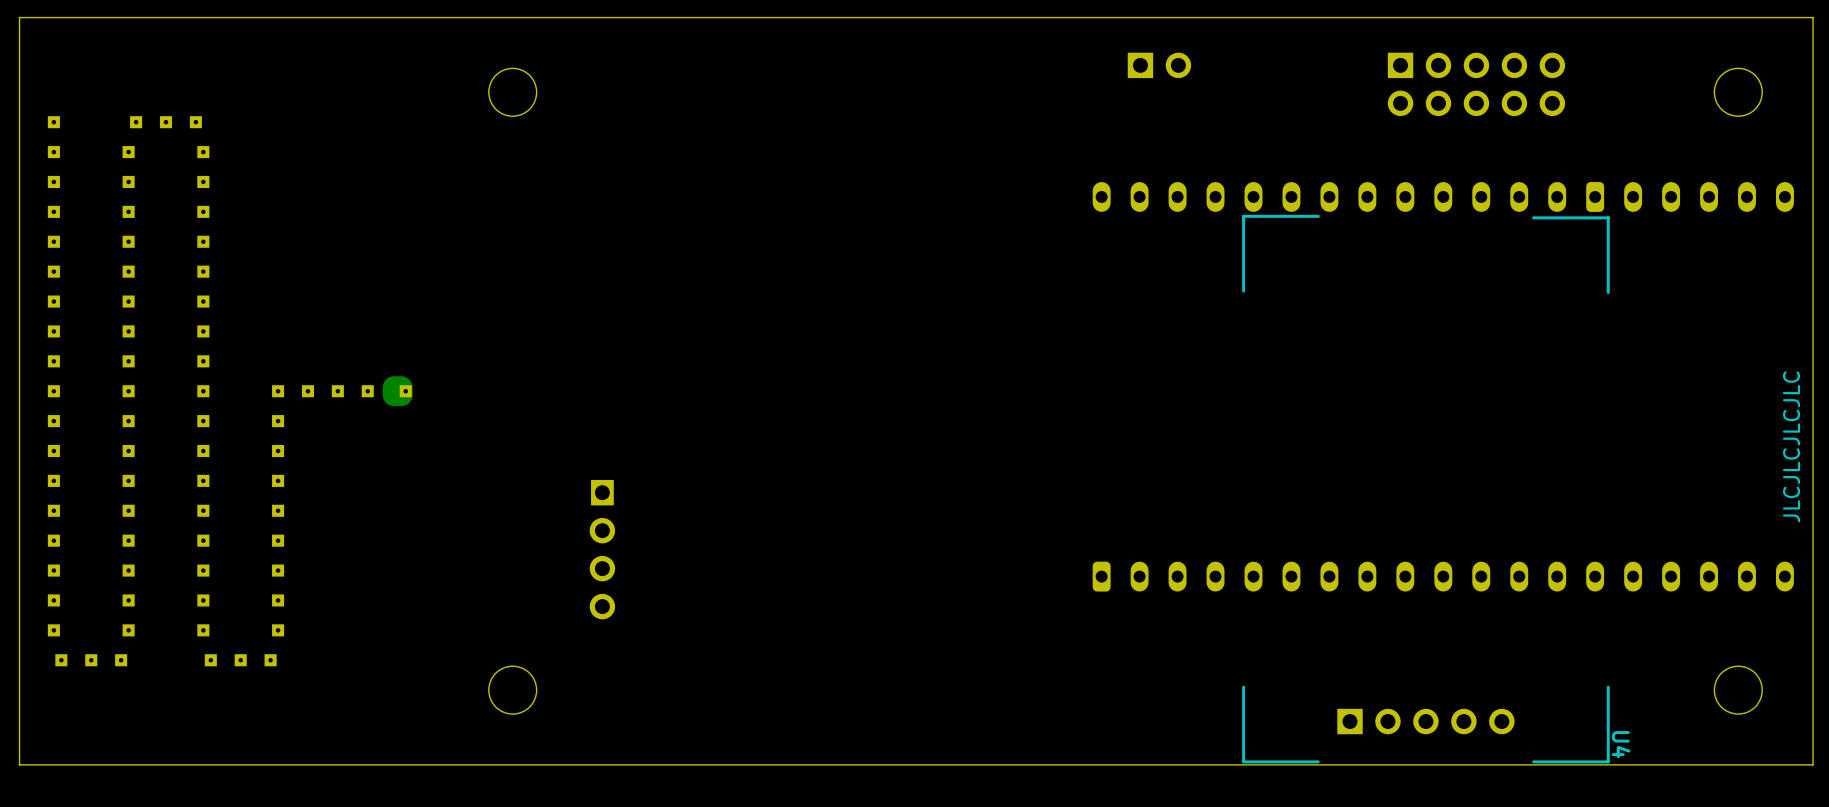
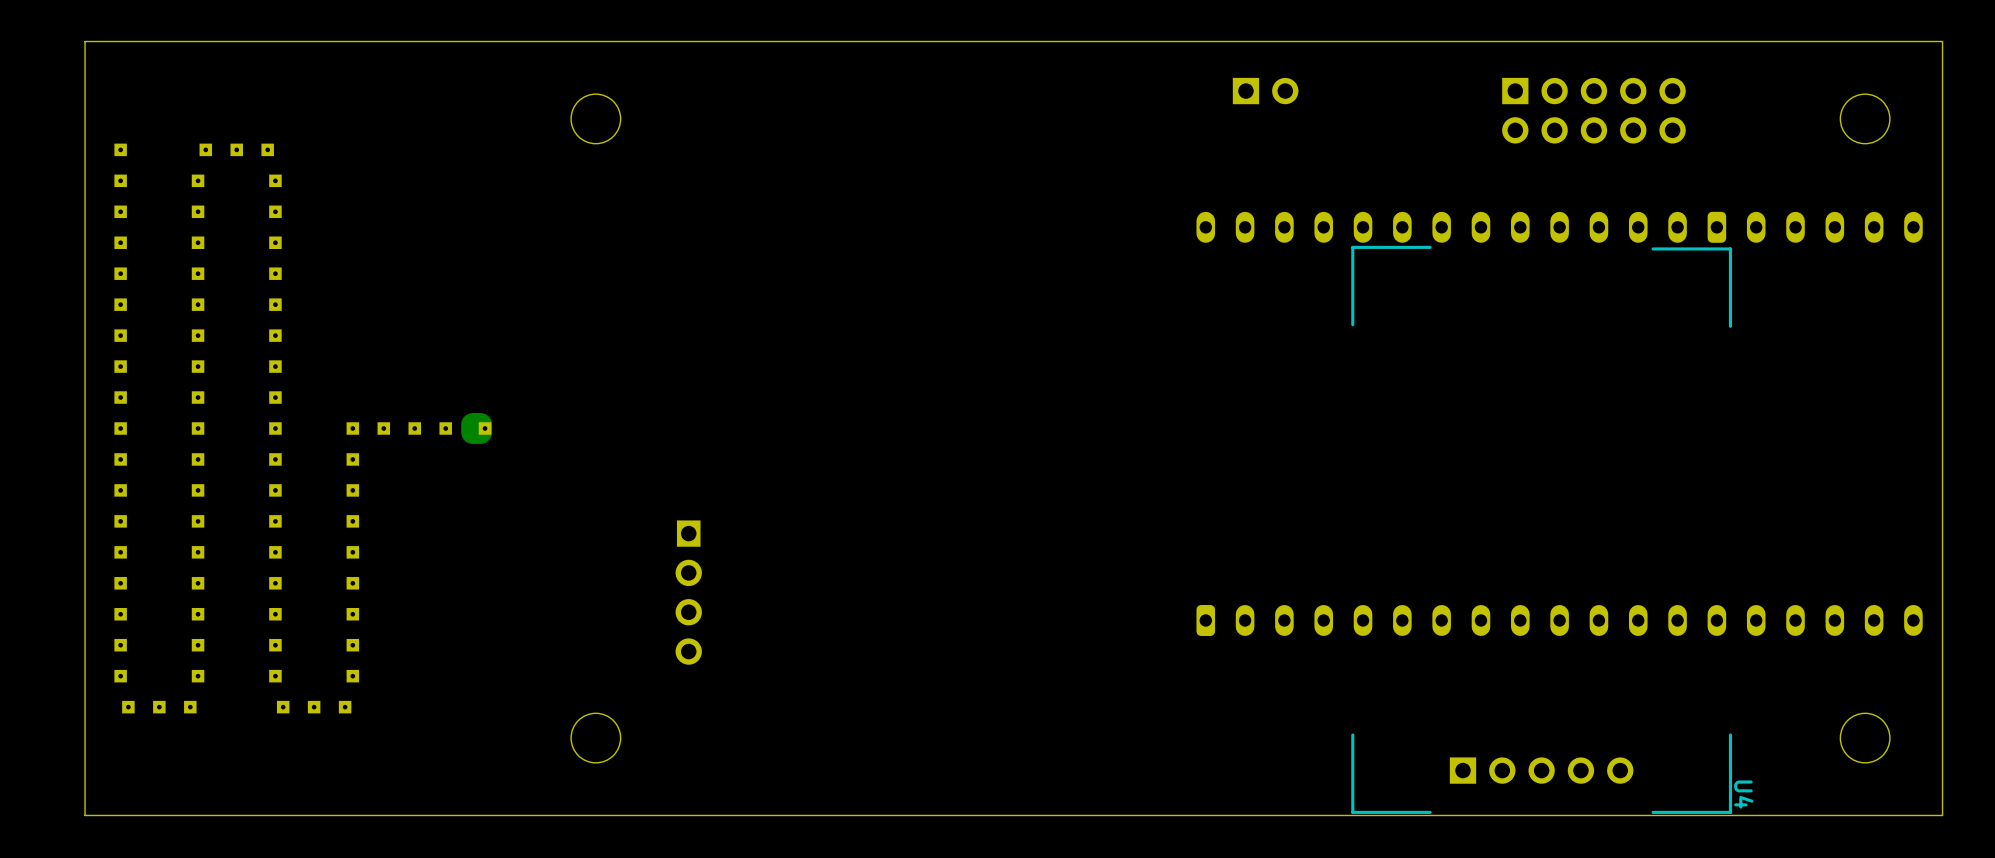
text: JLCJLCJLCJLC (1791, 446) -> none

